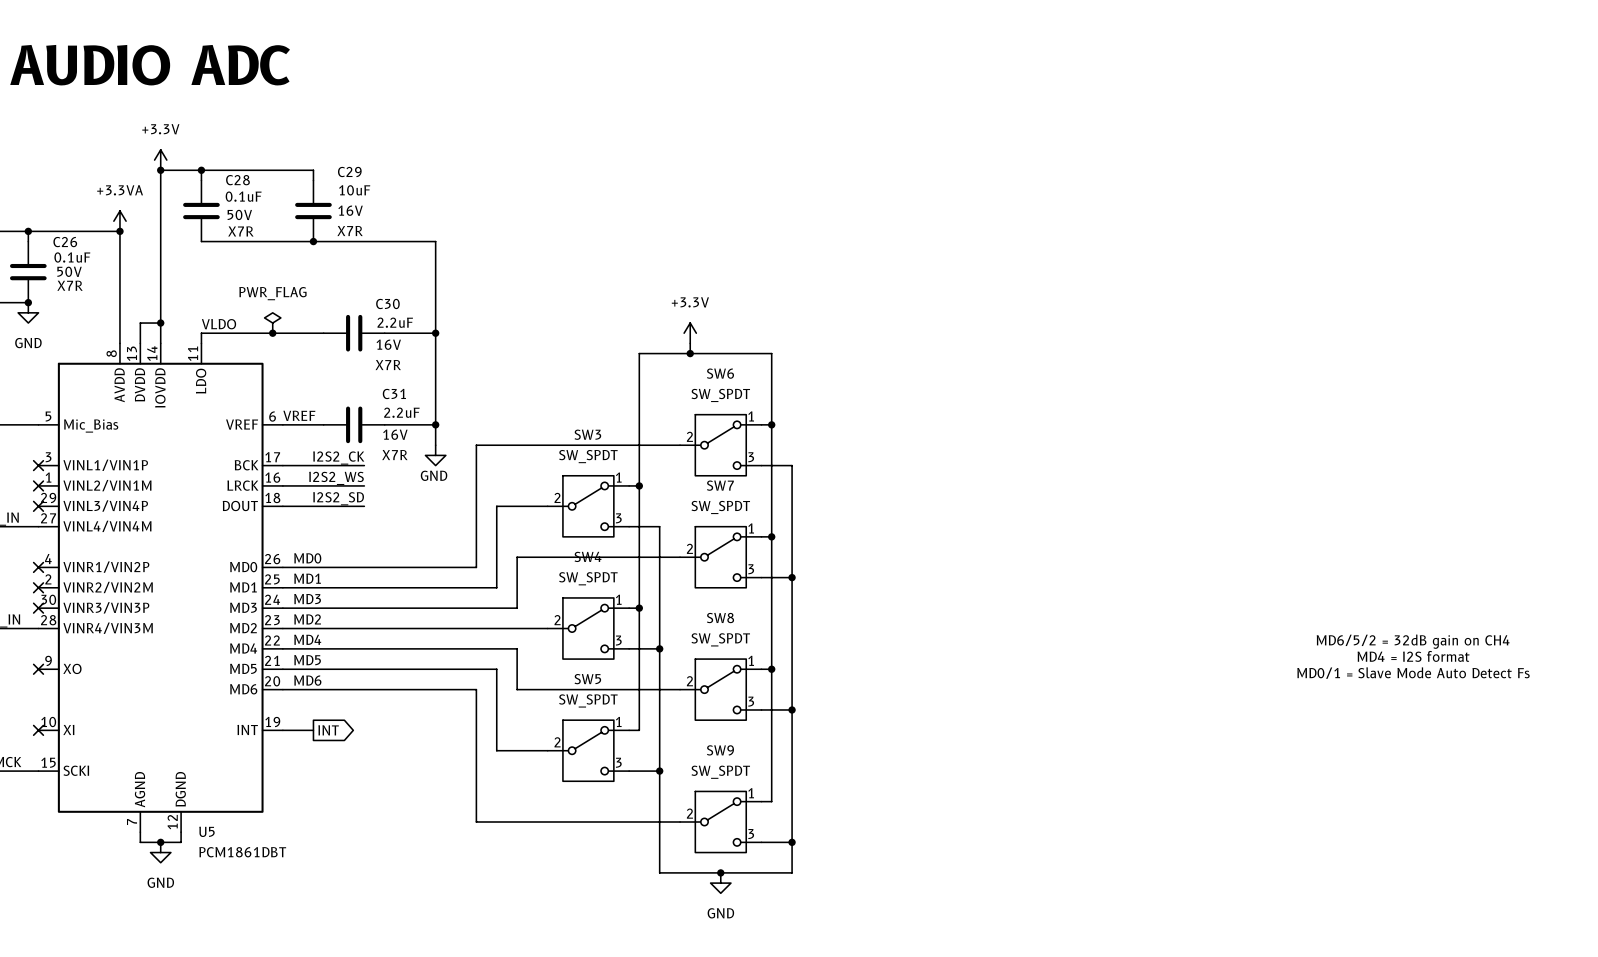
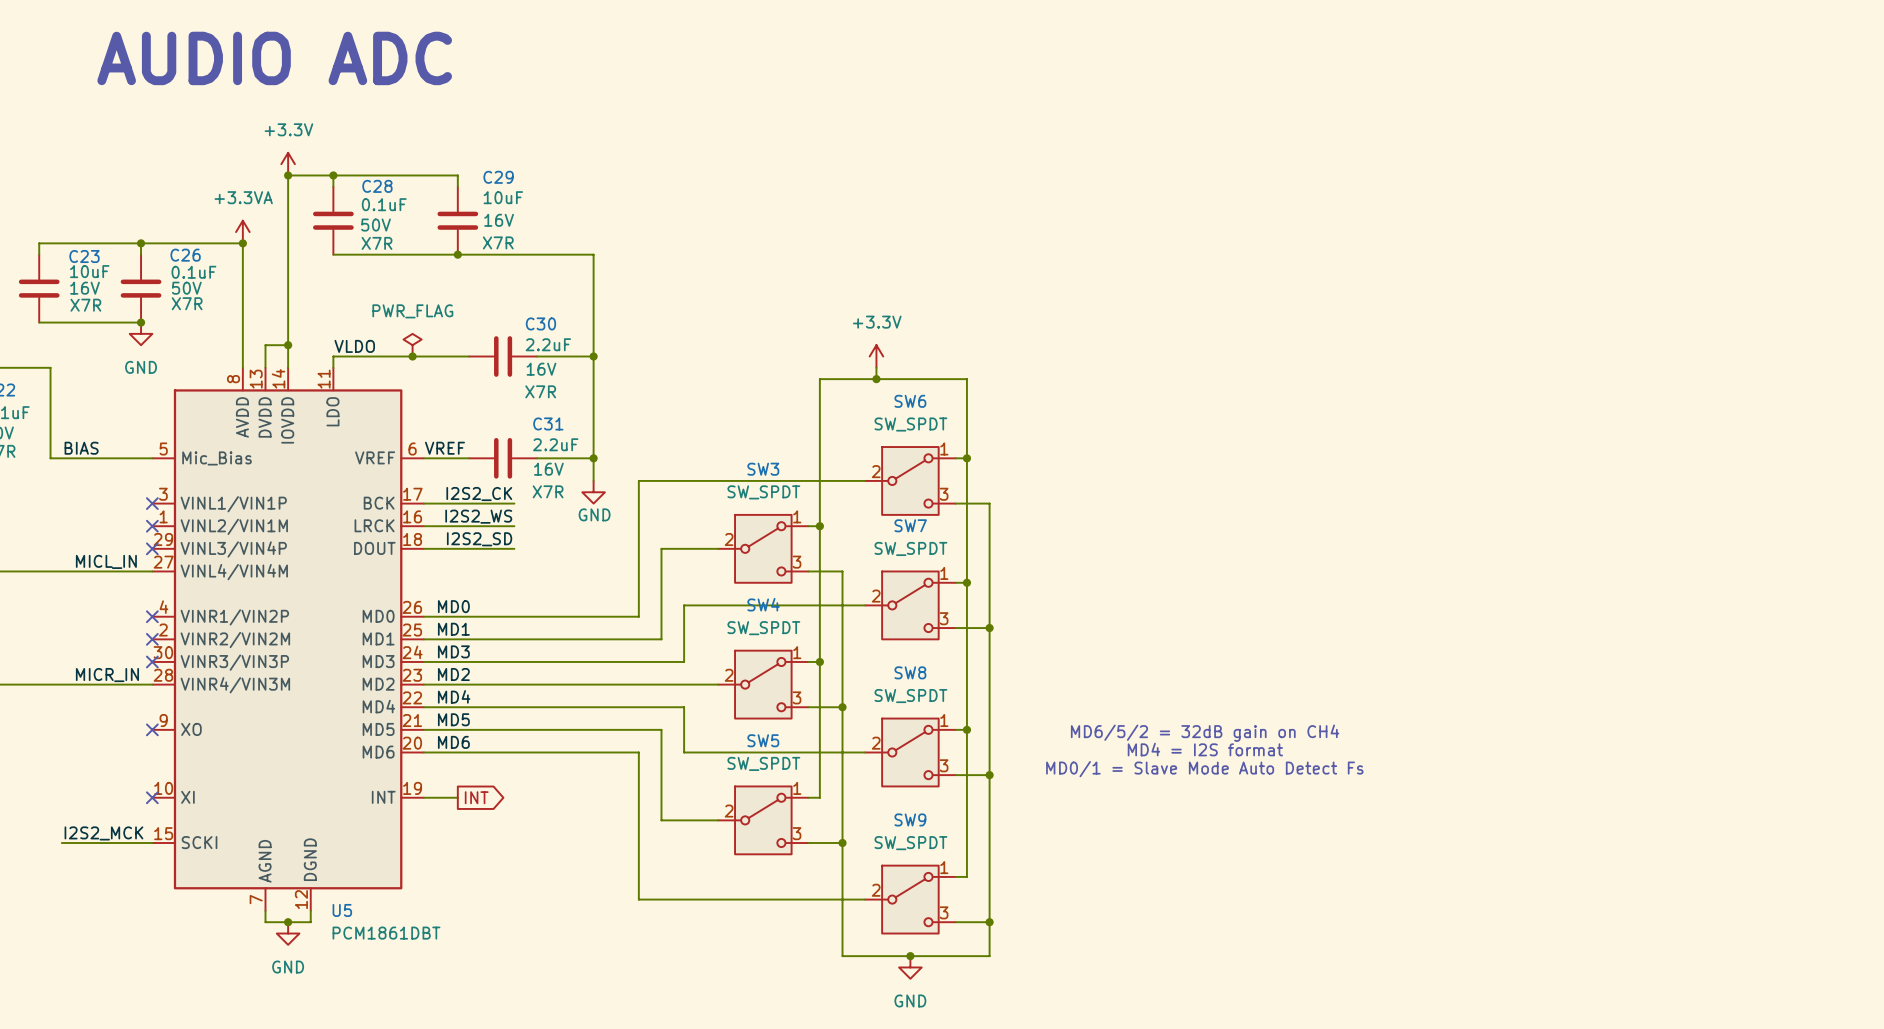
text: MD6/5/2 = 32dB gain on CH4 (1413, 641) -> none
text: MD4 = I2S format (1413, 656) -> none
text: none -> MD6/5/2 = 32dB gain on CH4 (1205, 733)
text: MD0/1 = Slave Mode Auto Detect Fs (1413, 673) -> none
text: none -> MD4 = I2S format (1205, 749)
text: none -> MD0/1 = Slave Mode Auto Detect Fs (1204, 769)

